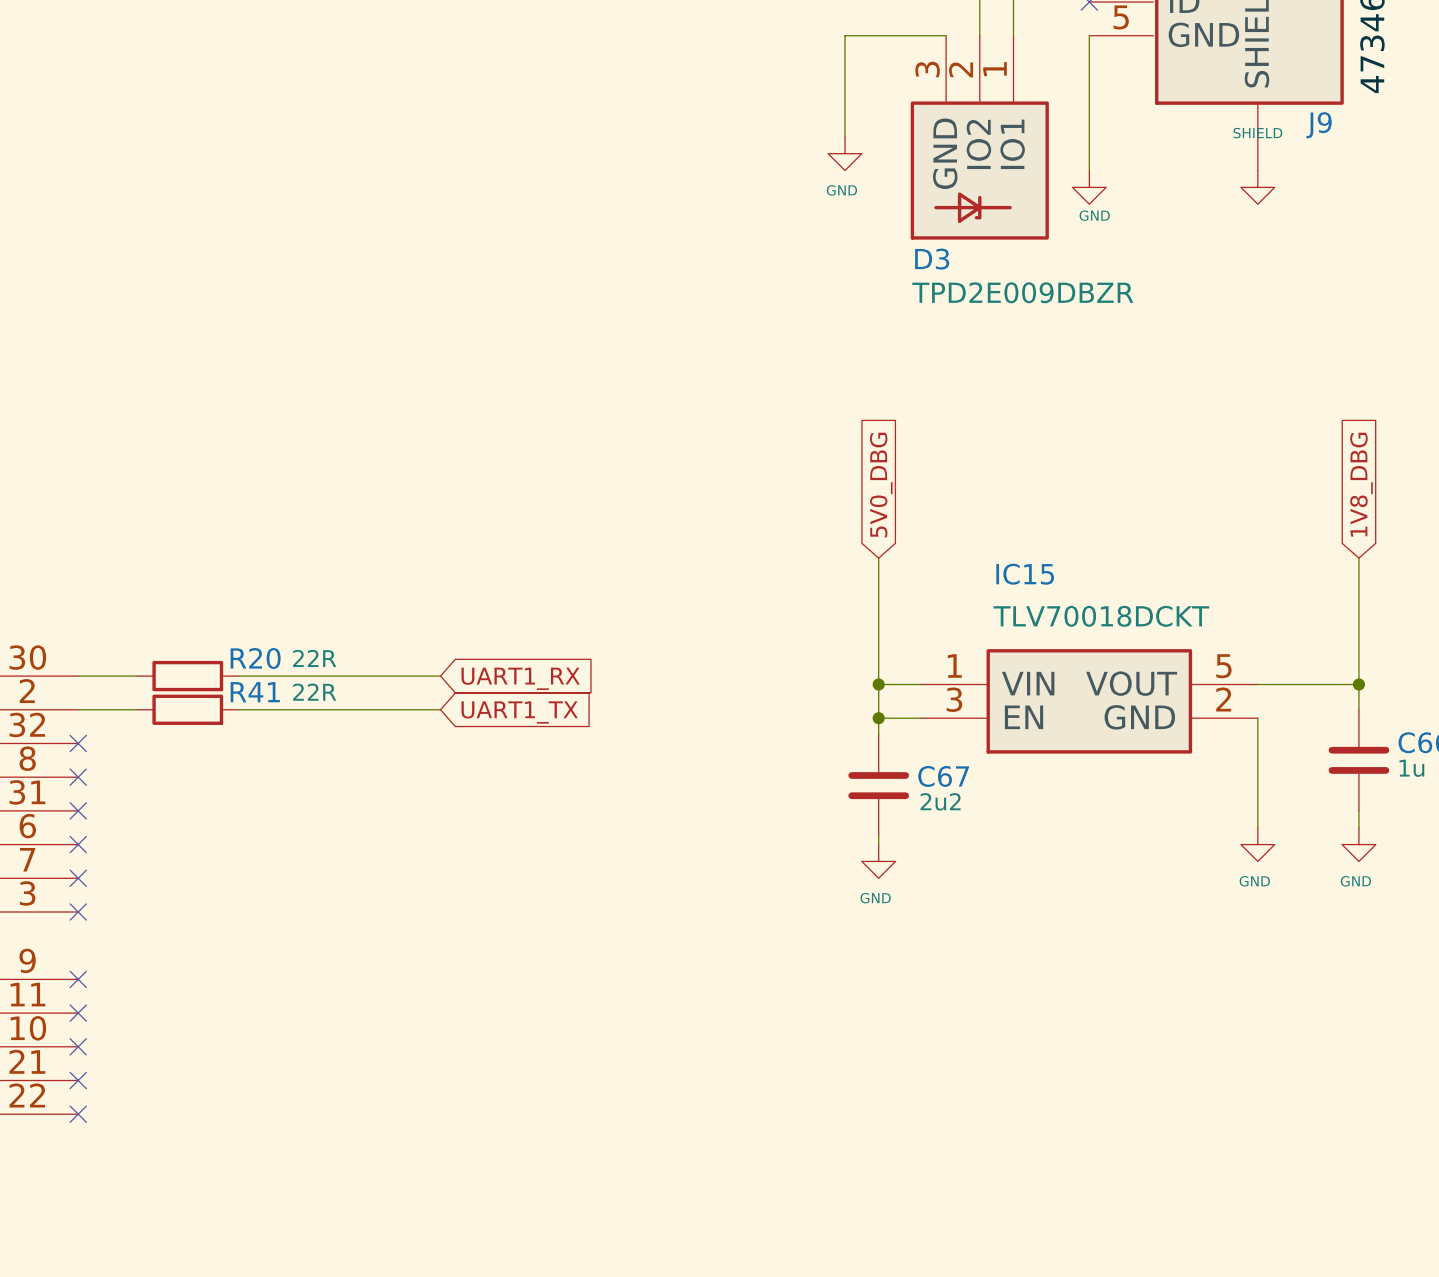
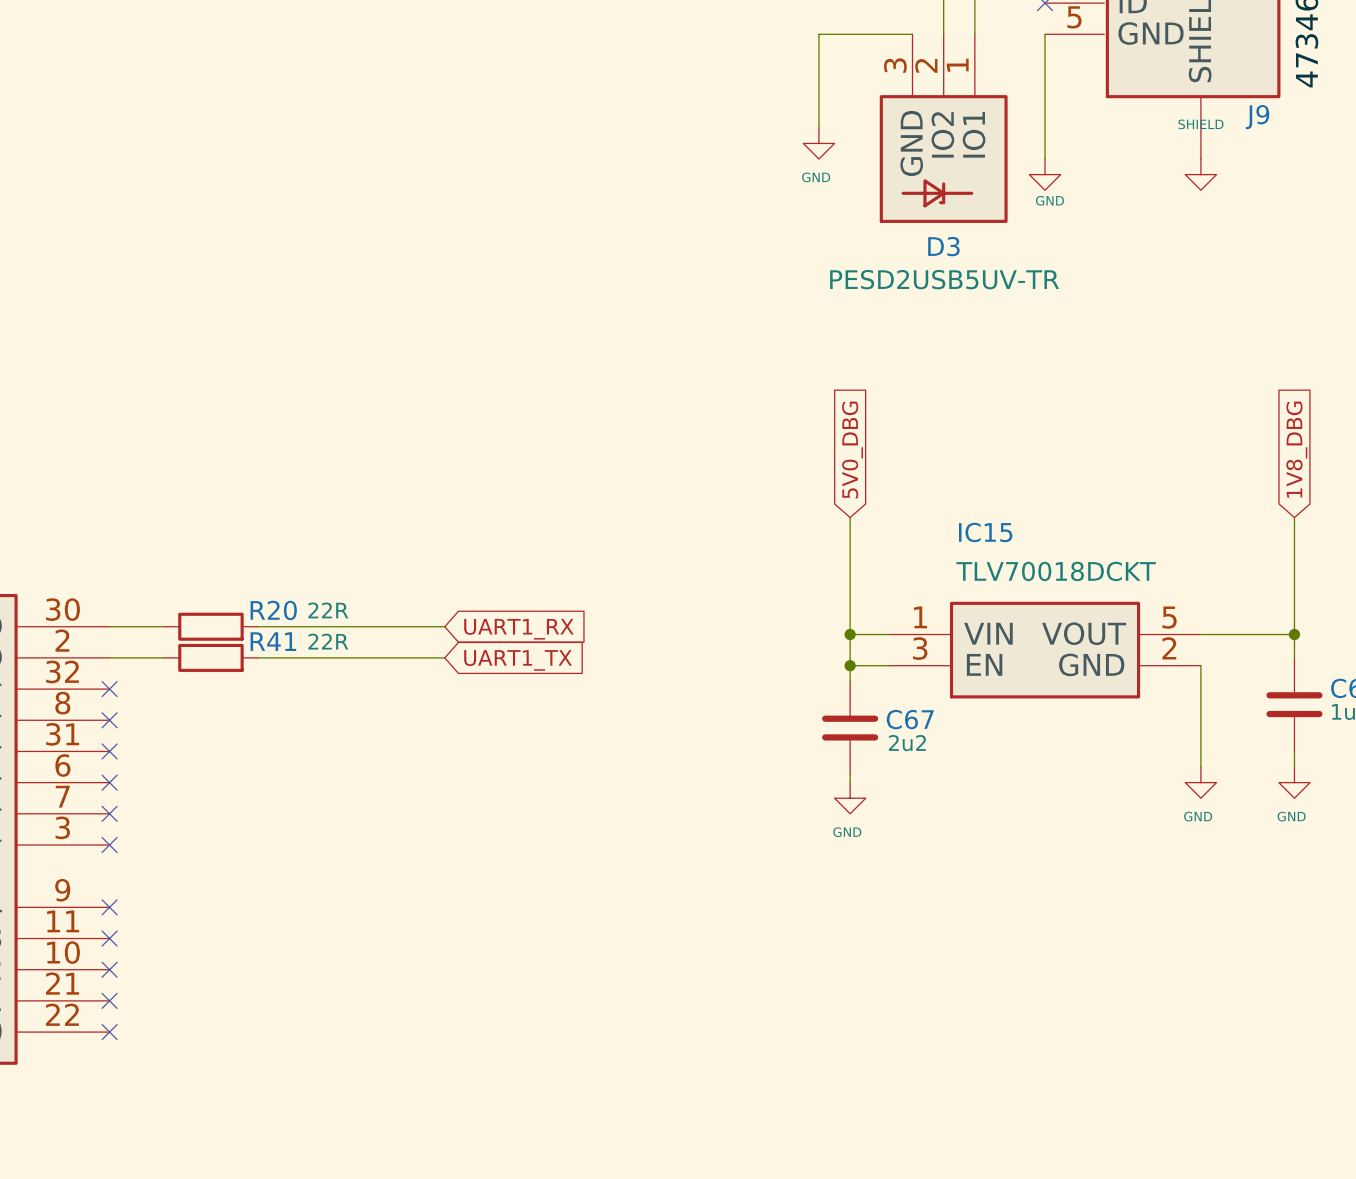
D3 name position: D3 (932, 259) -> D3 (943, 246)
D3 value: TPD2E009DBZR (1022, 292) -> PESD2USB5UV-TR (944, 279)

